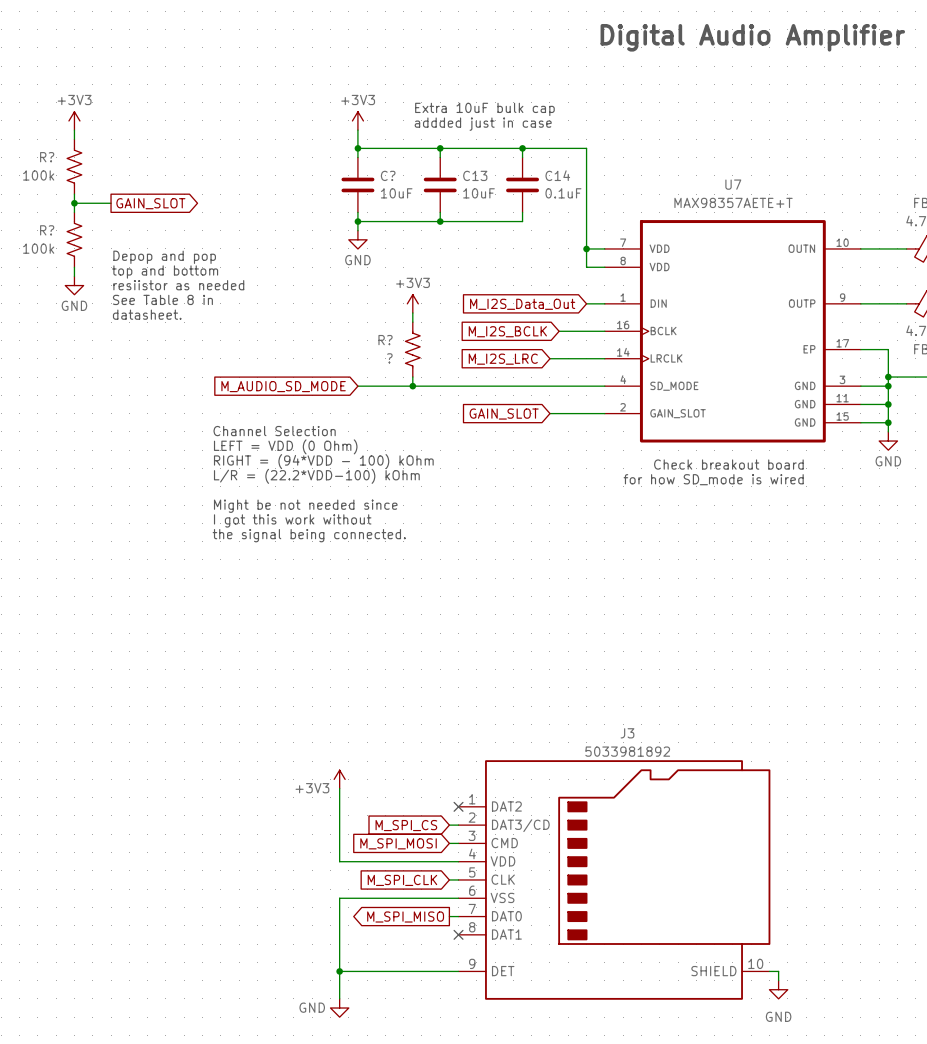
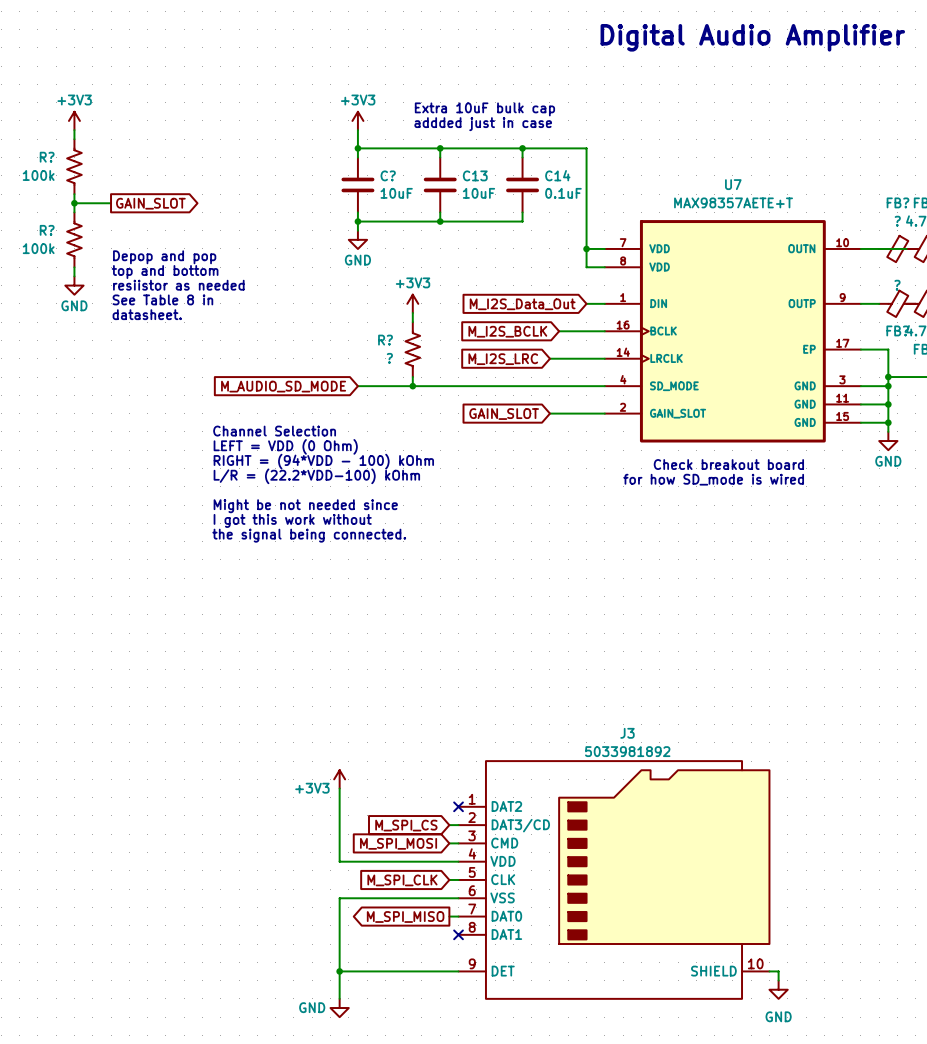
FB?: none -> ? (897, 248)
FB?: none -> ? (897, 303)

